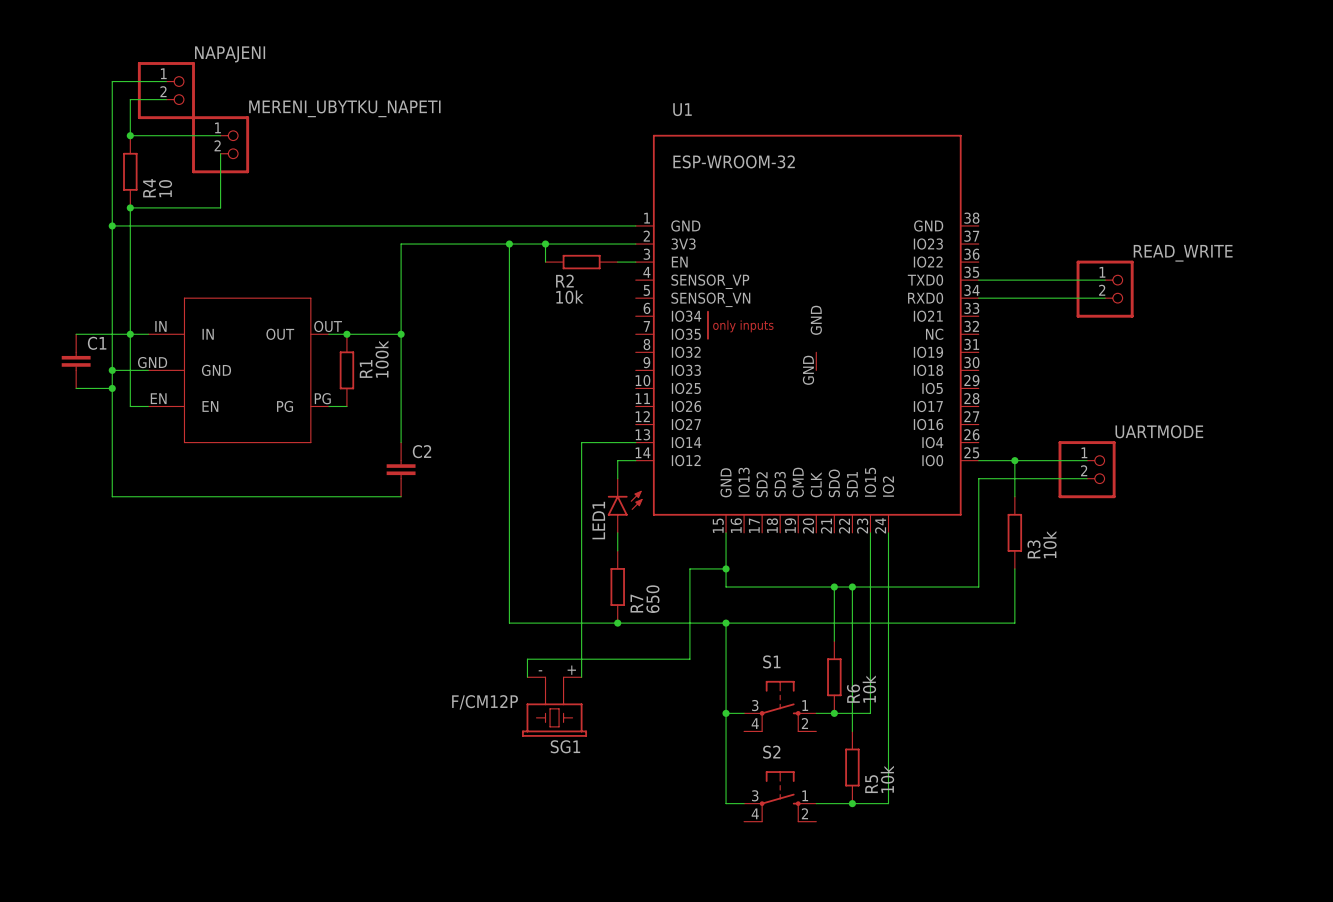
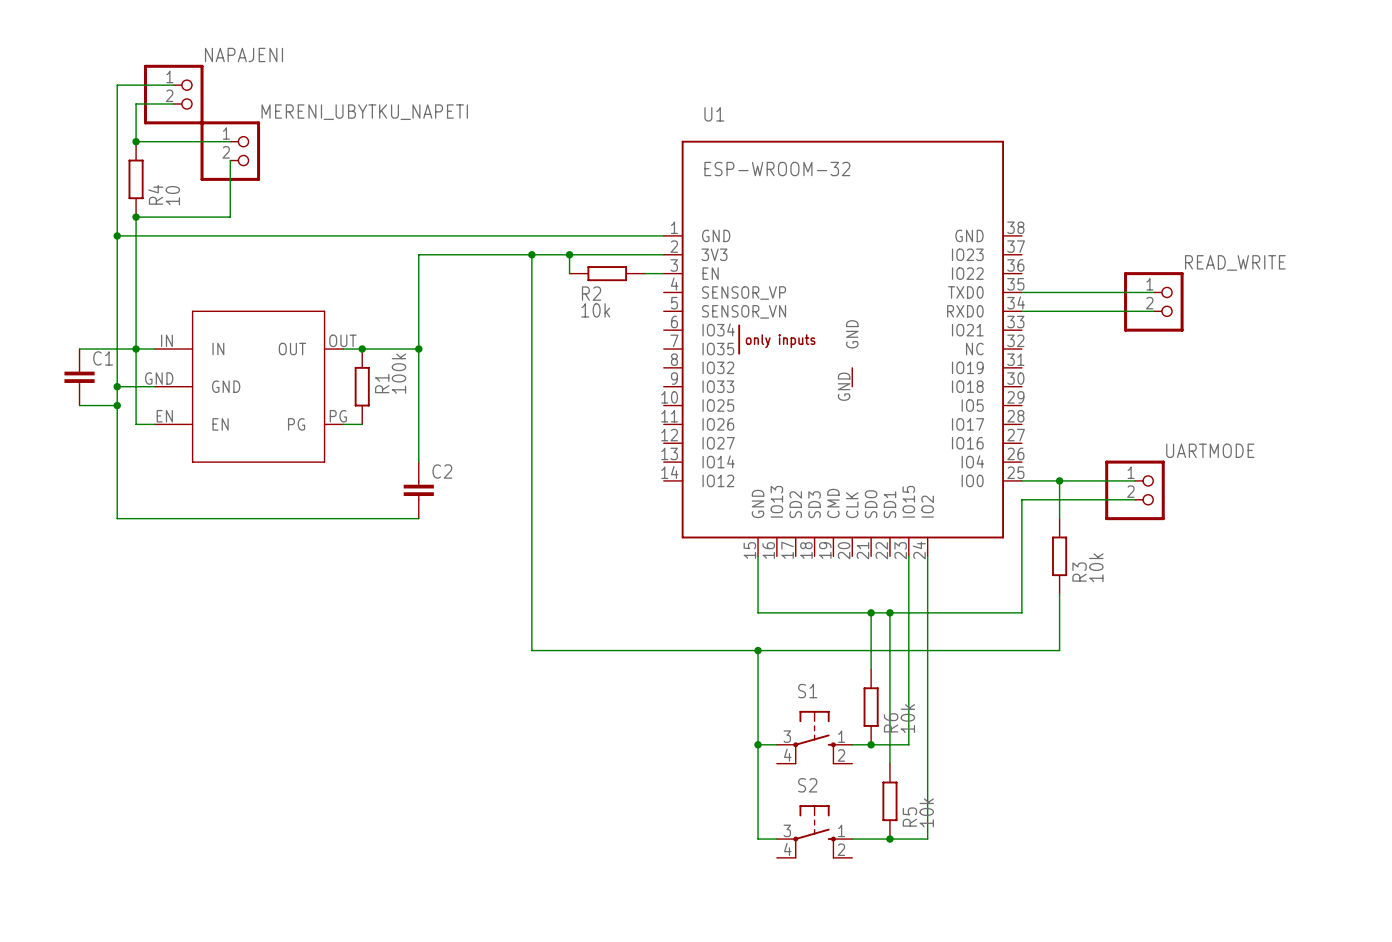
wire: (635, 442) (581, 442) (581, 677) -> none
wire: (635, 460) (617, 460) (617, 478) -> none
LED1: (625, 505) -> none
wire: (617, 532) (617, 550) -> none
wire: (726, 568) (689, 568) (689, 659) (527, 659) (527, 677) -> none
junction: (726, 568) -> none
R7: 650 (617, 587) -> none
junction: (617, 623) -> none
SG1: F/CM12P (554, 706) -> none

